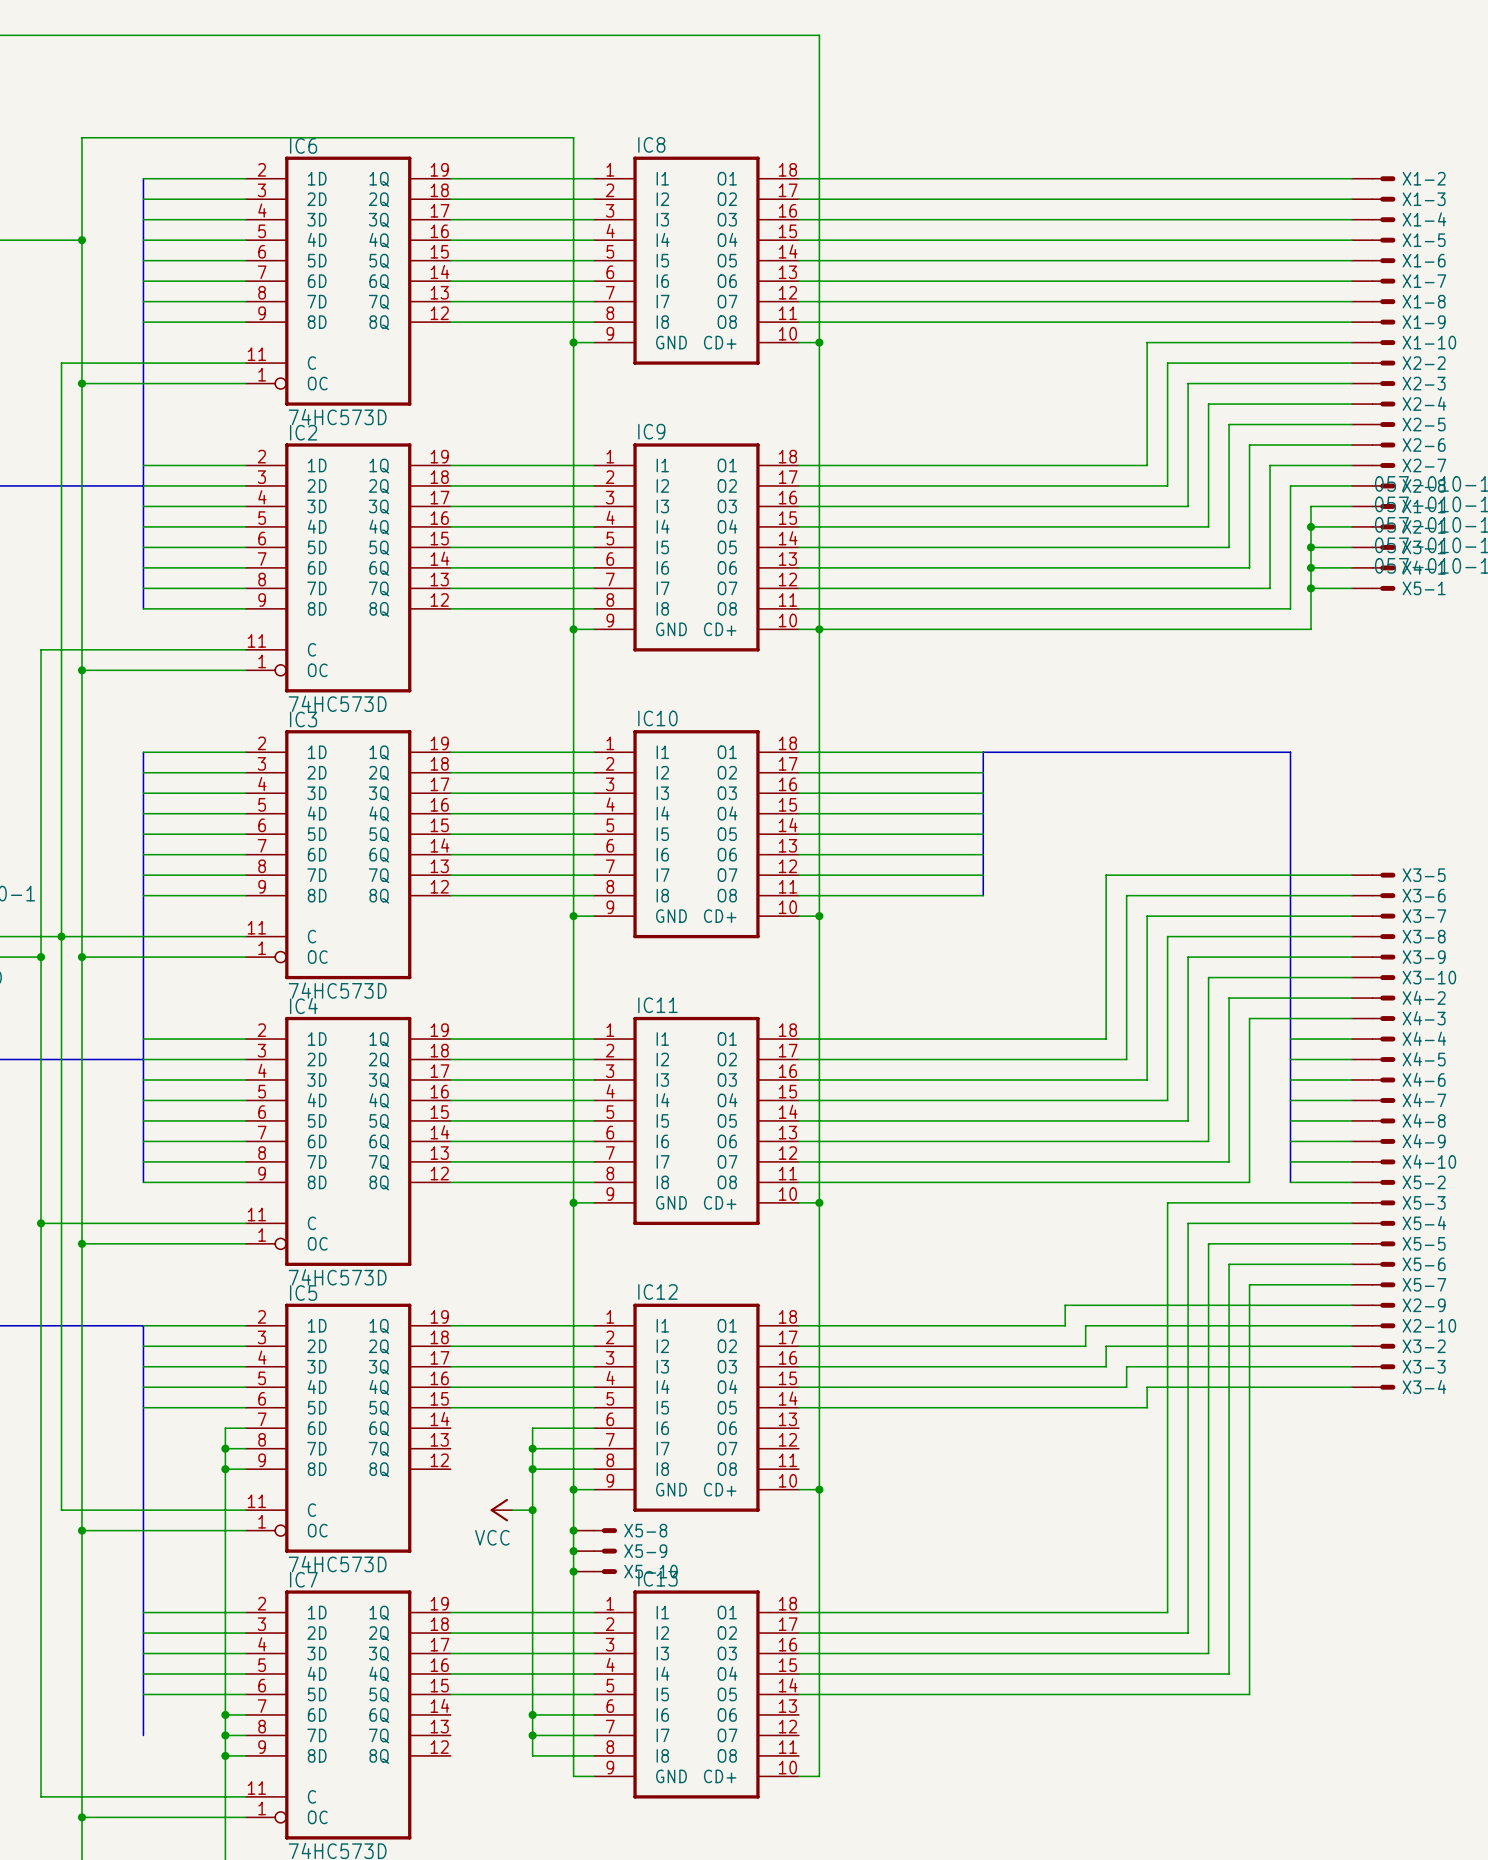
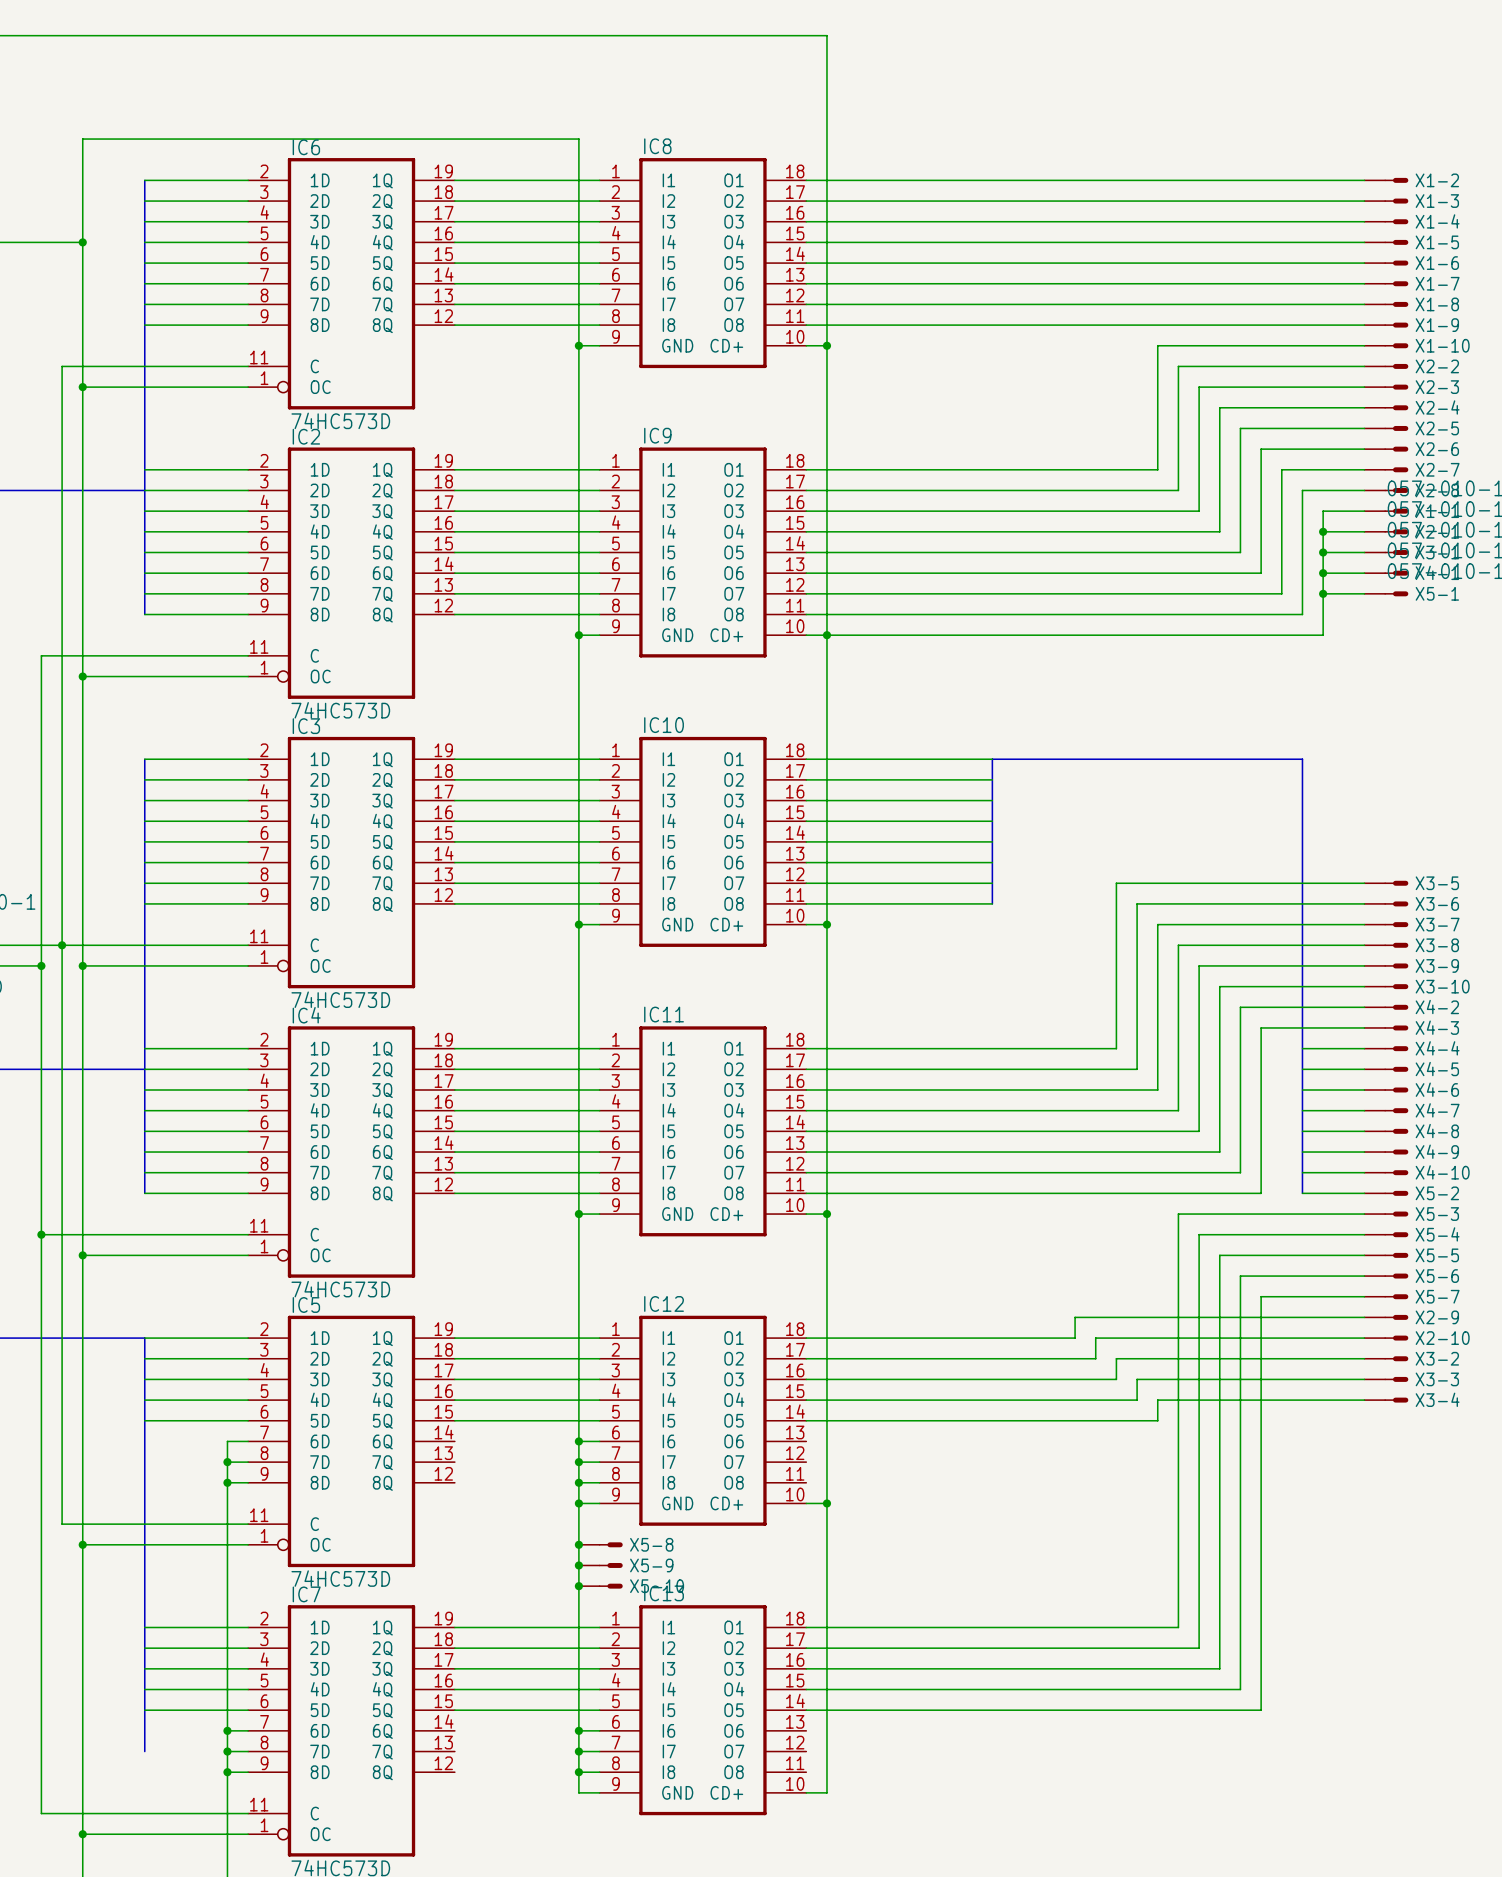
wire: (573, 1428) (532, 1428) (532, 1755) (573, 1755) -> none
junction: none -> (578, 1441)
wire: (532, 1448) (573, 1448) -> none
junction: (532, 1448) -> none
junction: none -> (578, 1462)
wire: (532, 1469) (573, 1469) -> none
junction: (532, 1469) -> none
junction: none -> (578, 1482)
power symbol: VCC (501, 1510) -> none
wire: (512, 1510) (532, 1510) -> none
junction: (532, 1510) -> none
wire: (532, 1714) (573, 1714) -> none
junction: (532, 1714) -> none
junction: none -> (578, 1730)
wire: (532, 1735) (573, 1735) -> none
junction: (532, 1735) -> none
junction: none -> (578, 1751)
junction: none -> (578, 1772)

